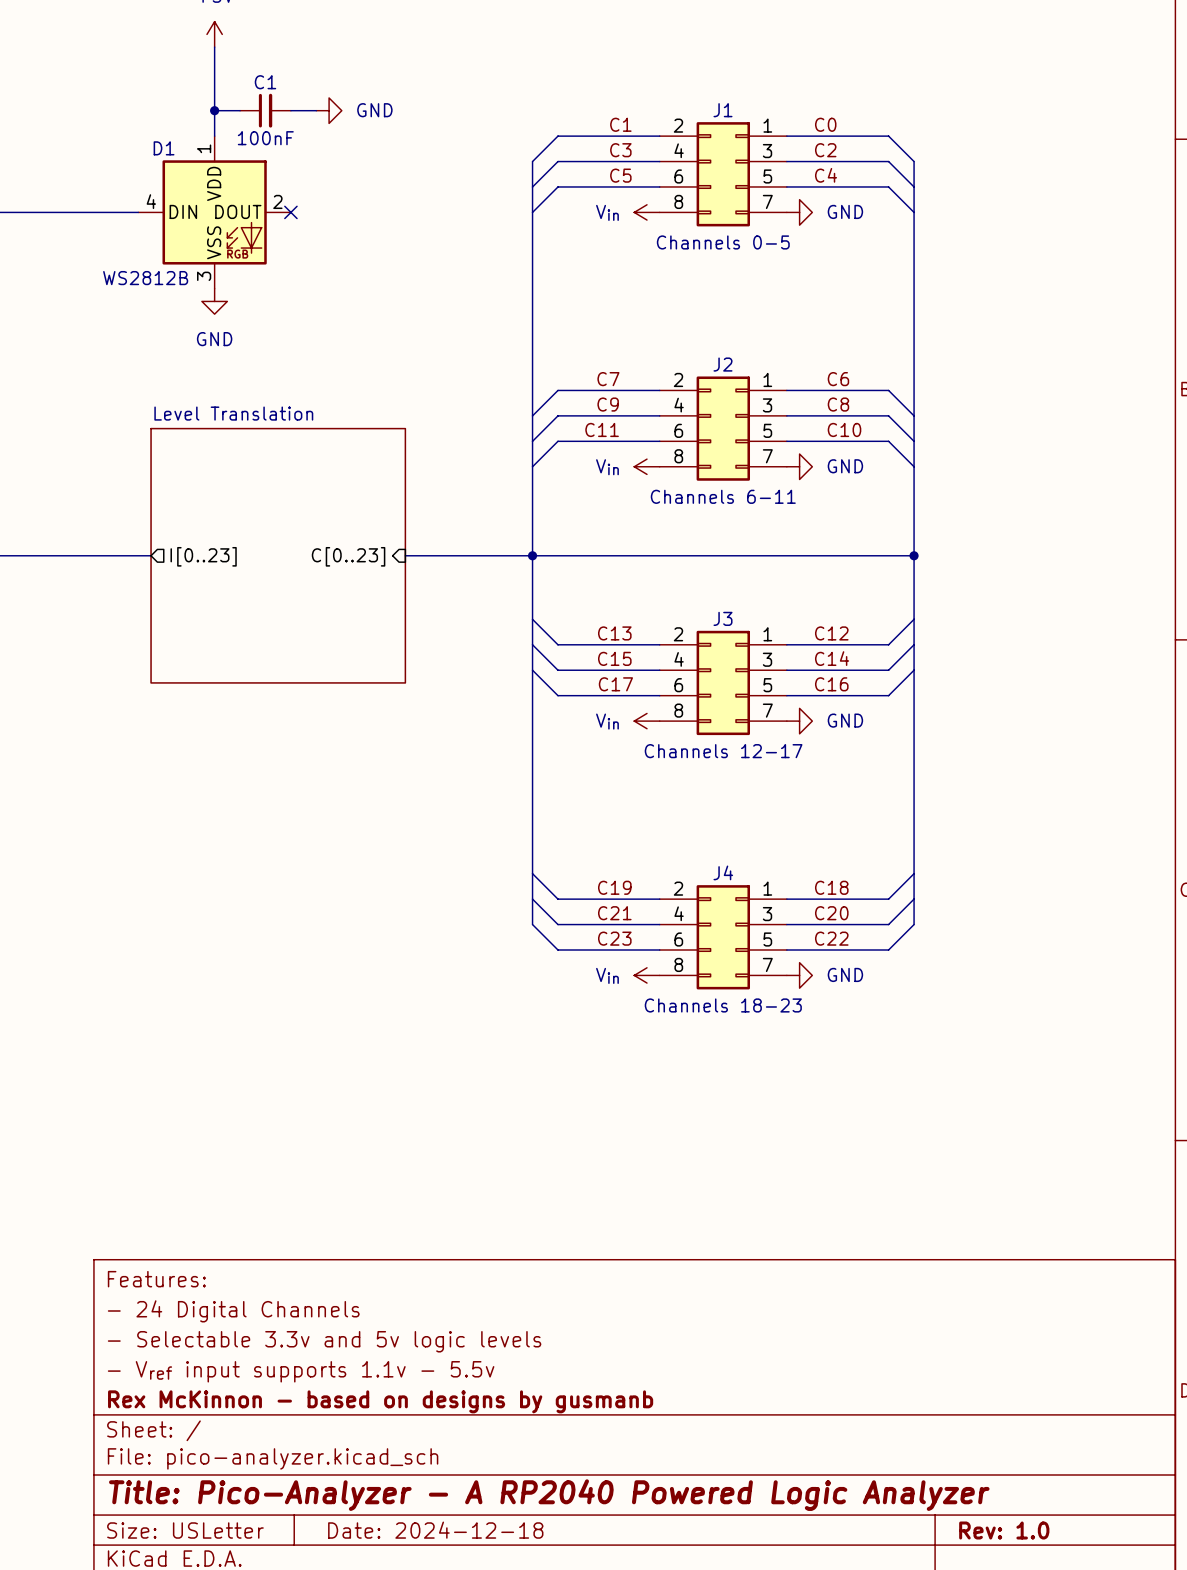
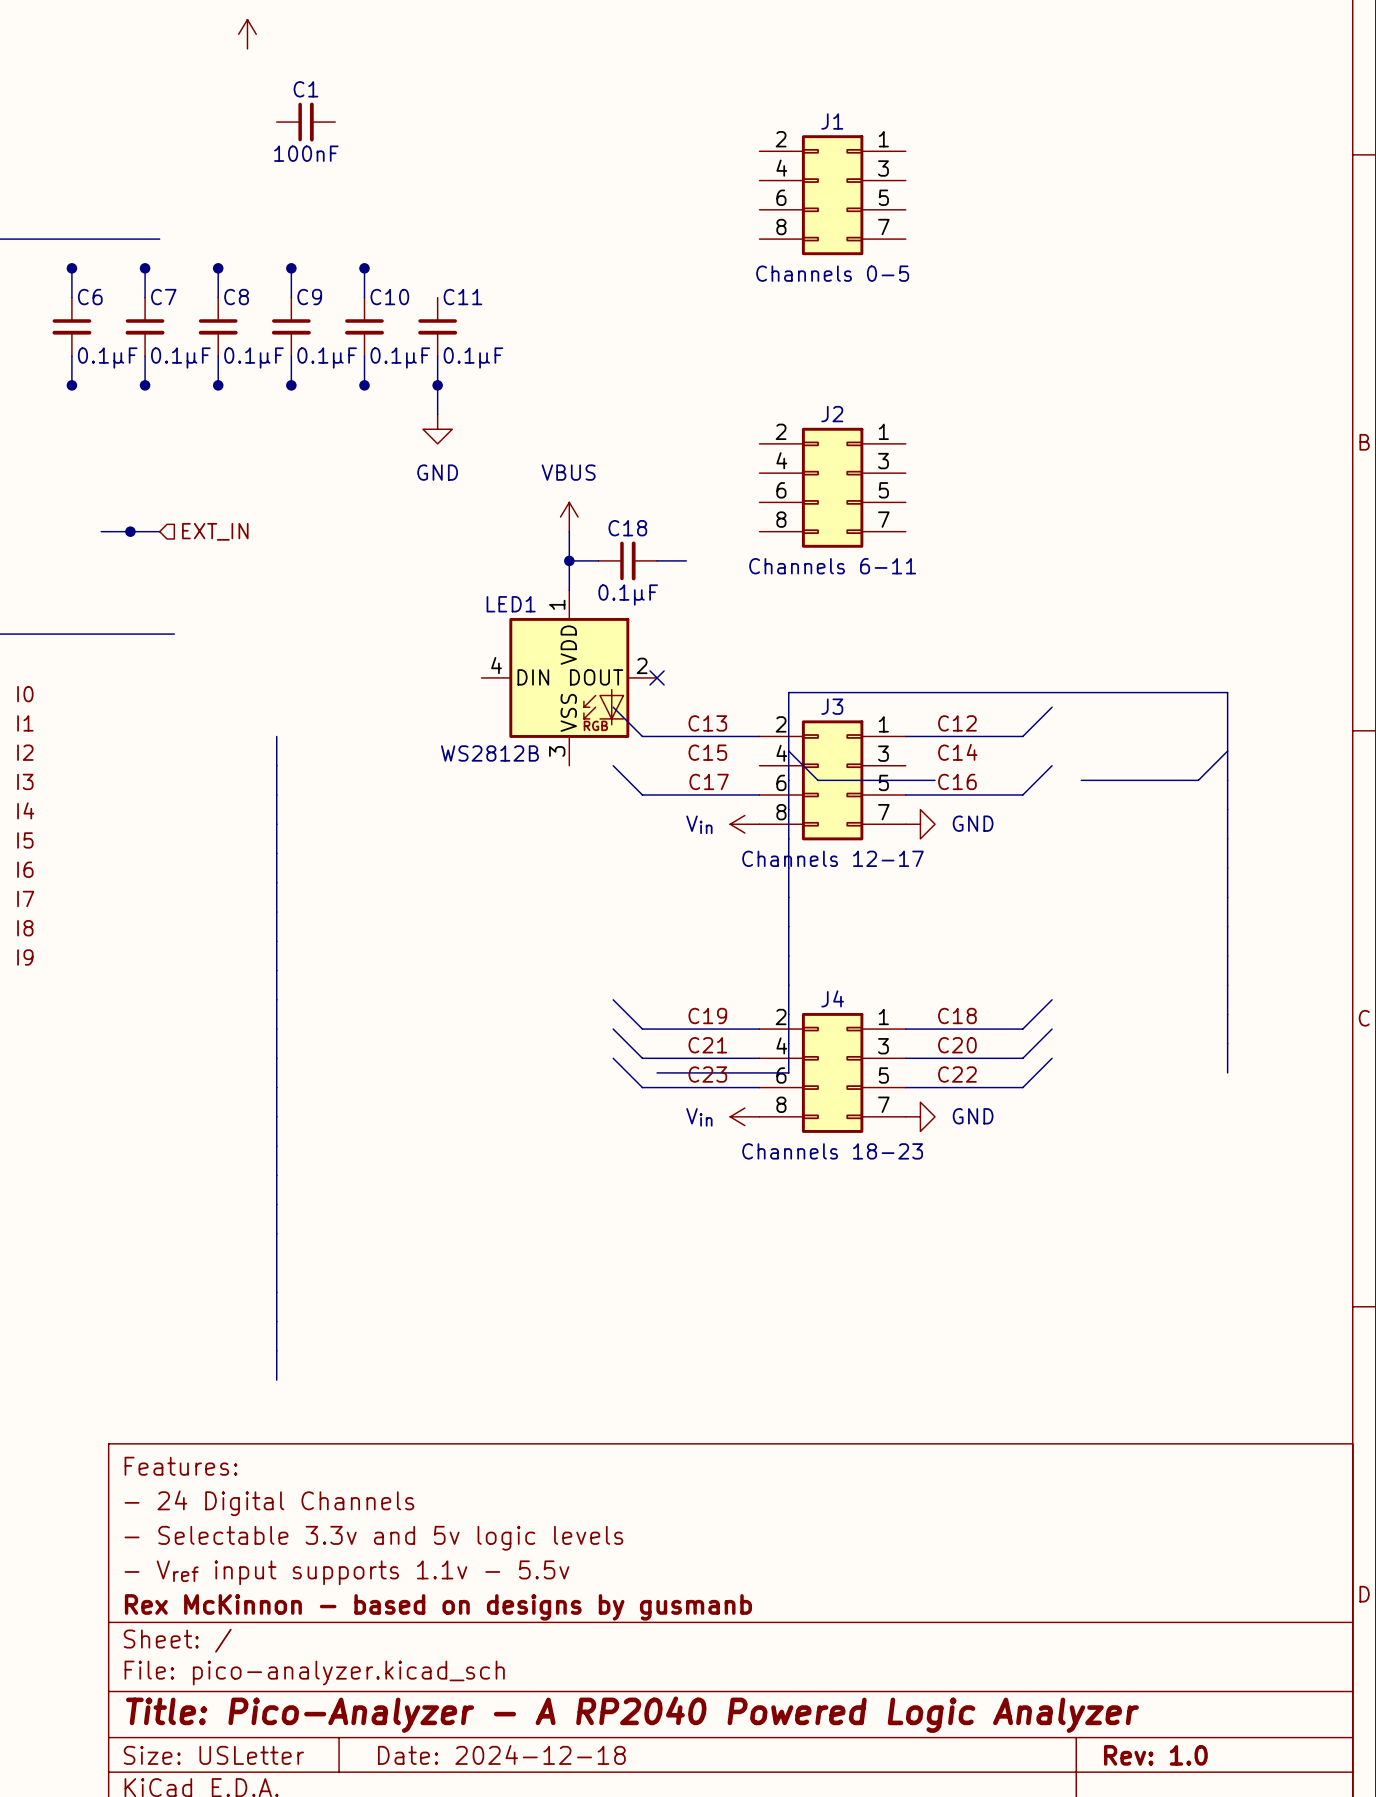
wire: (214, 47) (214, 136) -> none
wire: (214, 110) (240, 110) -> none
junction: (214, 110) -> none
wire: (290, 110) (316, 110) -> none
power symbol: GND (329, 110) -> none
label: C1 (620, 124) -> none
label: C0 (825, 124) -> none
wire: (659, 136) (557, 136) (532, 161) -> none
wire: (786, 136) (888, 136) (914, 161) -> none
label: C3 (620, 150) -> none
label: C2 (825, 150) -> none
bus: (532, 161) (532, 924) -> none
wire: (659, 161) (557, 161) (532, 186) -> none
wire: (786, 161) (888, 161) (914, 186) -> none
bus: (914, 161) (914, 924) -> none
label: C5 (620, 175) -> none
label: C4 (826, 175) -> none
wire: (659, 186) (557, 186) (532, 212) -> none
wire: (786, 186) (888, 186) (914, 212) -> none
D1: WS2812B (214, 212) -> none
no-connect mark: (290, 212) -> none
power symbol: Vin (646, 212) -> none
power symbol: GND (799, 212) -> none
wire: none -> (71, 268) (71, 297)
junction: none -> (71, 268)
wire: none -> (145, 268) (145, 297)
junction: none -> (145, 268)
junction: none -> (218, 268)
junction: none -> (291, 268)
wire: none -> (364, 268) (364, 297)
junction: none -> (364, 268)
C6: none -> 0.1µF (71, 326)
C7: none -> 0.1µF (145, 326)
C8: none -> 0.1µF (218, 326)
C9: none -> 0.1µF (291, 326)
C10: none -> 0.1µF (364, 326)
C11: none -> 0.1µF (437, 326)
power symbol: GND (214, 301) -> none
wire: none -> (71, 356) (71, 385)
wire: none -> (145, 356) (145, 385)
wire: none -> (218, 356) (218, 385)
wire: none -> (291, 356) (291, 385)
wire: none -> (364, 356) (364, 385)
wire: none -> (437, 356) (437, 414)
junction: none -> (71, 385)
junction: none -> (145, 385)
junction: none -> (218, 385)
junction: none -> (291, 385)
junction: none -> (364, 385)
junction: none -> (437, 385)
power symbol: none -> GND (437, 429)
label: C7 (608, 379) -> none
label: C6 (838, 379) -> none
wire: (659, 390) (557, 390) (532, 415) -> none
wire: (786, 390) (888, 390) (914, 415) -> none
label: C9 (608, 404) -> none
label: C8 (838, 404) -> none
wire: (659, 415) (557, 415) (532, 441) -> none
wire: (786, 415) (888, 415) (914, 441) -> none
label: C11 (602, 429) -> none
label: C10 (844, 429) -> none
wire: (659, 441) (557, 441) (532, 466) -> none
wire: (786, 441) (888, 441) (914, 466) -> none
power symbol: none -> VBUS (569, 517)
wire: none -> (101, 531) (159, 531)
junction: none -> (130, 531)
hierarchical label: none -> EXT_IN (215, 531)
wire: none -> (569, 531) (569, 590)
power symbol: Vin (646, 466) -> none
power symbol: GND (799, 466) -> none
wire: none -> (569, 560) (598, 560)
junction: none -> (569, 560)
C18: none -> 0.1µF (627, 560)
wire: none -> (657, 560) (686, 560)
sheet Level Translation: (278, 555) -> none
bus: (405, 555) (914, 555) -> none
junction: (532, 555) -> none
junction: (914, 555) -> none
sheet pin: I[0..23] (203, 556) -> none
sheet pin: C[0..23] (348, 556) -> none
LED1: none -> WS2812B (569, 677)
no-connect mark: none -> (657, 677)
label: none -> I0 (25, 694)
label: none -> I1 (25, 723)
bus: none -> (276, 736) (276, 1380)
wire: (532, 644) (557, 670) (659, 670) -> (788, 751) (818, 780) (935, 780)
wire: (914, 644) (888, 670) (786, 670) -> (1227, 751) (1198, 780) (1081, 780)
label: none -> I2 (25, 752)
label: none -> I3 (25, 781)
label: none -> I4 (25, 810)
label: none -> I5 (25, 840)
label: none -> I6 (25, 869)
label: none -> I7 (25, 898)
label: none -> I8 (25, 928)
label: none -> I9 (25, 957)
bus: none -> (657, 1072) (788, 1072) (788, 692) (1227, 692) (1227, 1072)

